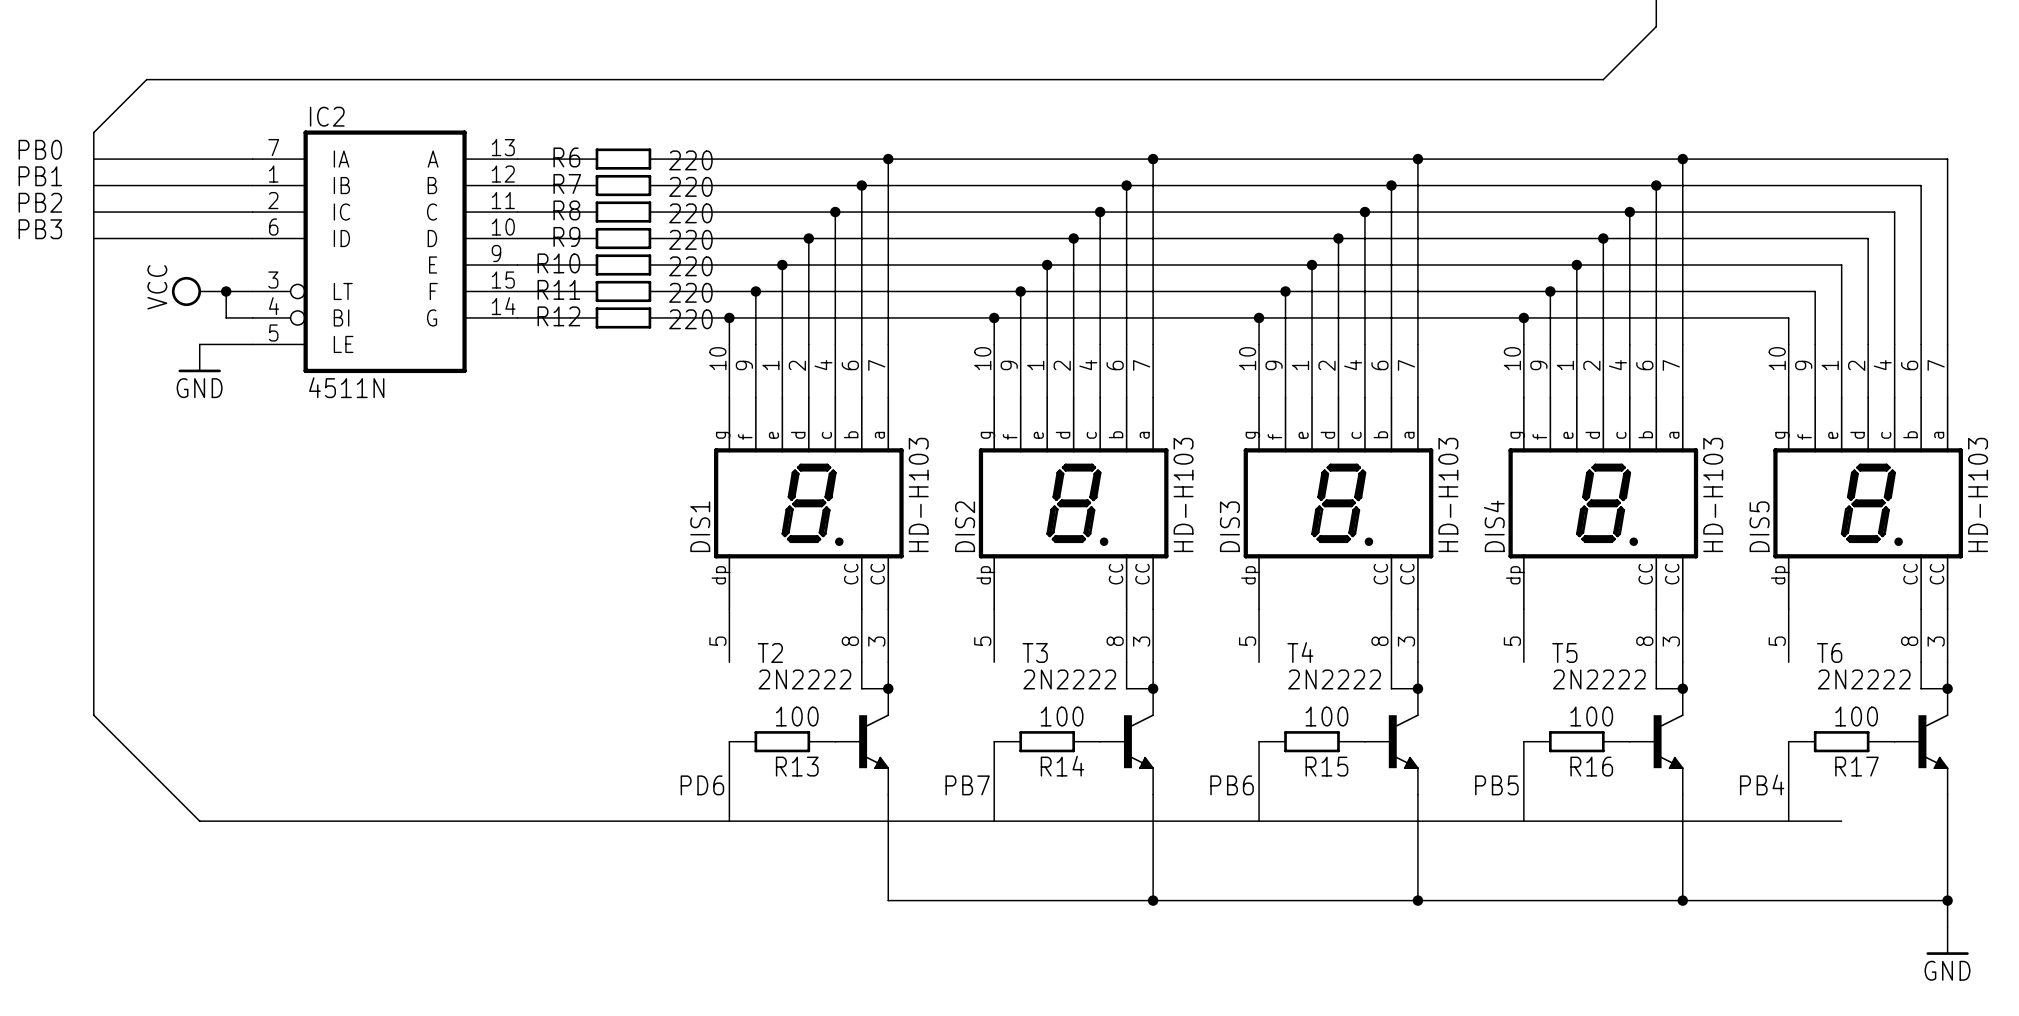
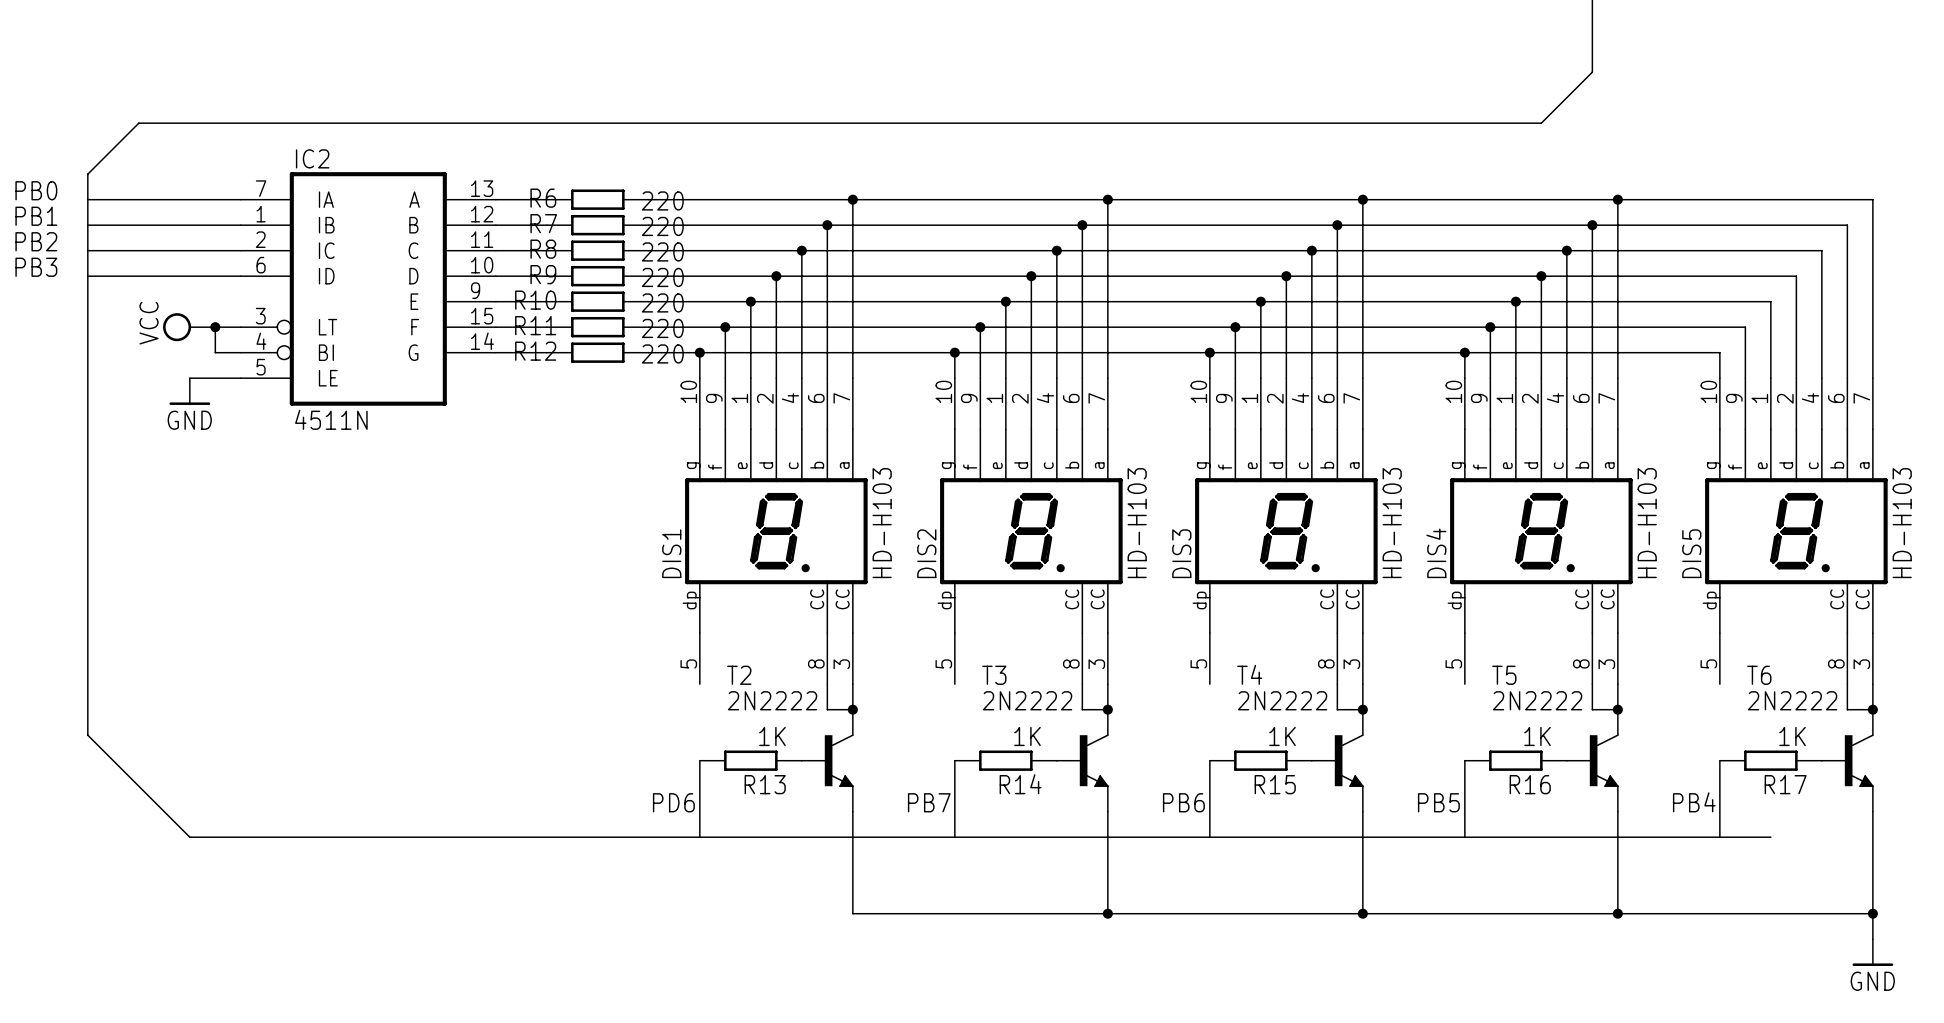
R13 value: 100 (797, 716) -> 1K (772, 736)
R14 value: 100 (1062, 716) -> 1K (1027, 736)
R15 value: 100 (1326, 716) -> 1K (1282, 736)
R16 value: 100 (1591, 716) -> 1K (1537, 736)
R17 value: 100 (1856, 716) -> 1K (1792, 736)

